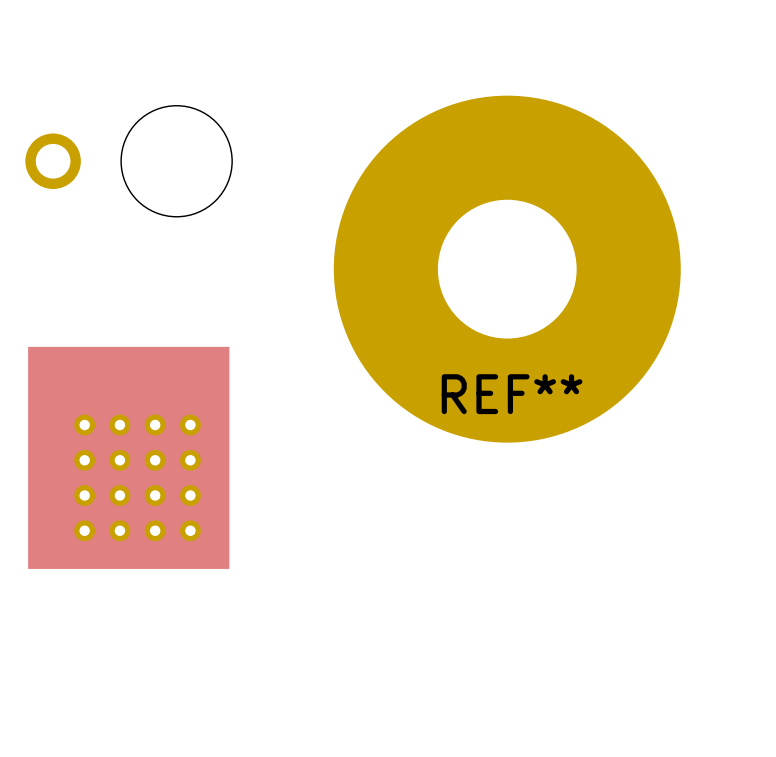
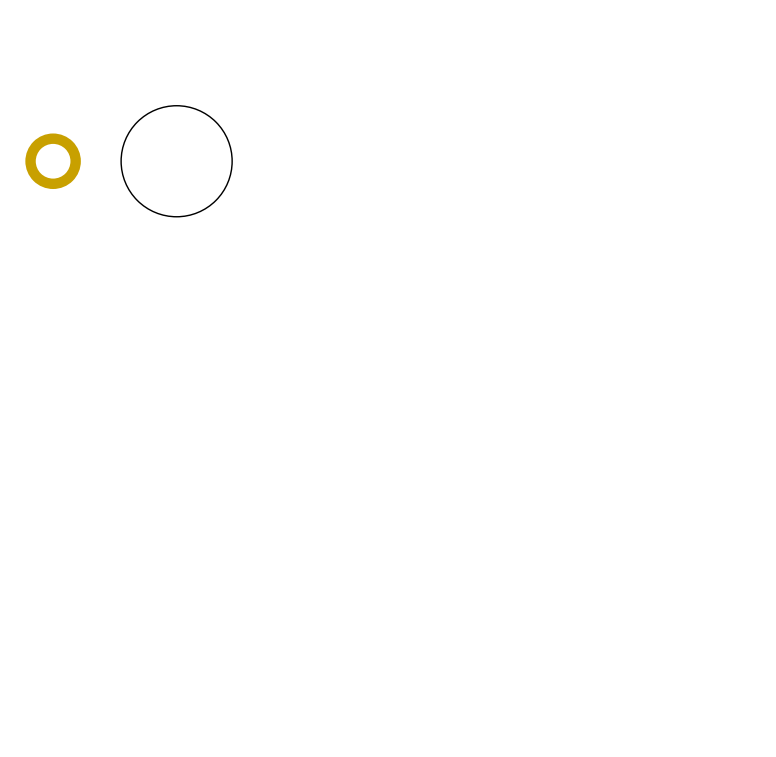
REF**: (507, 269) -> none
part: (128, 457) -> none

